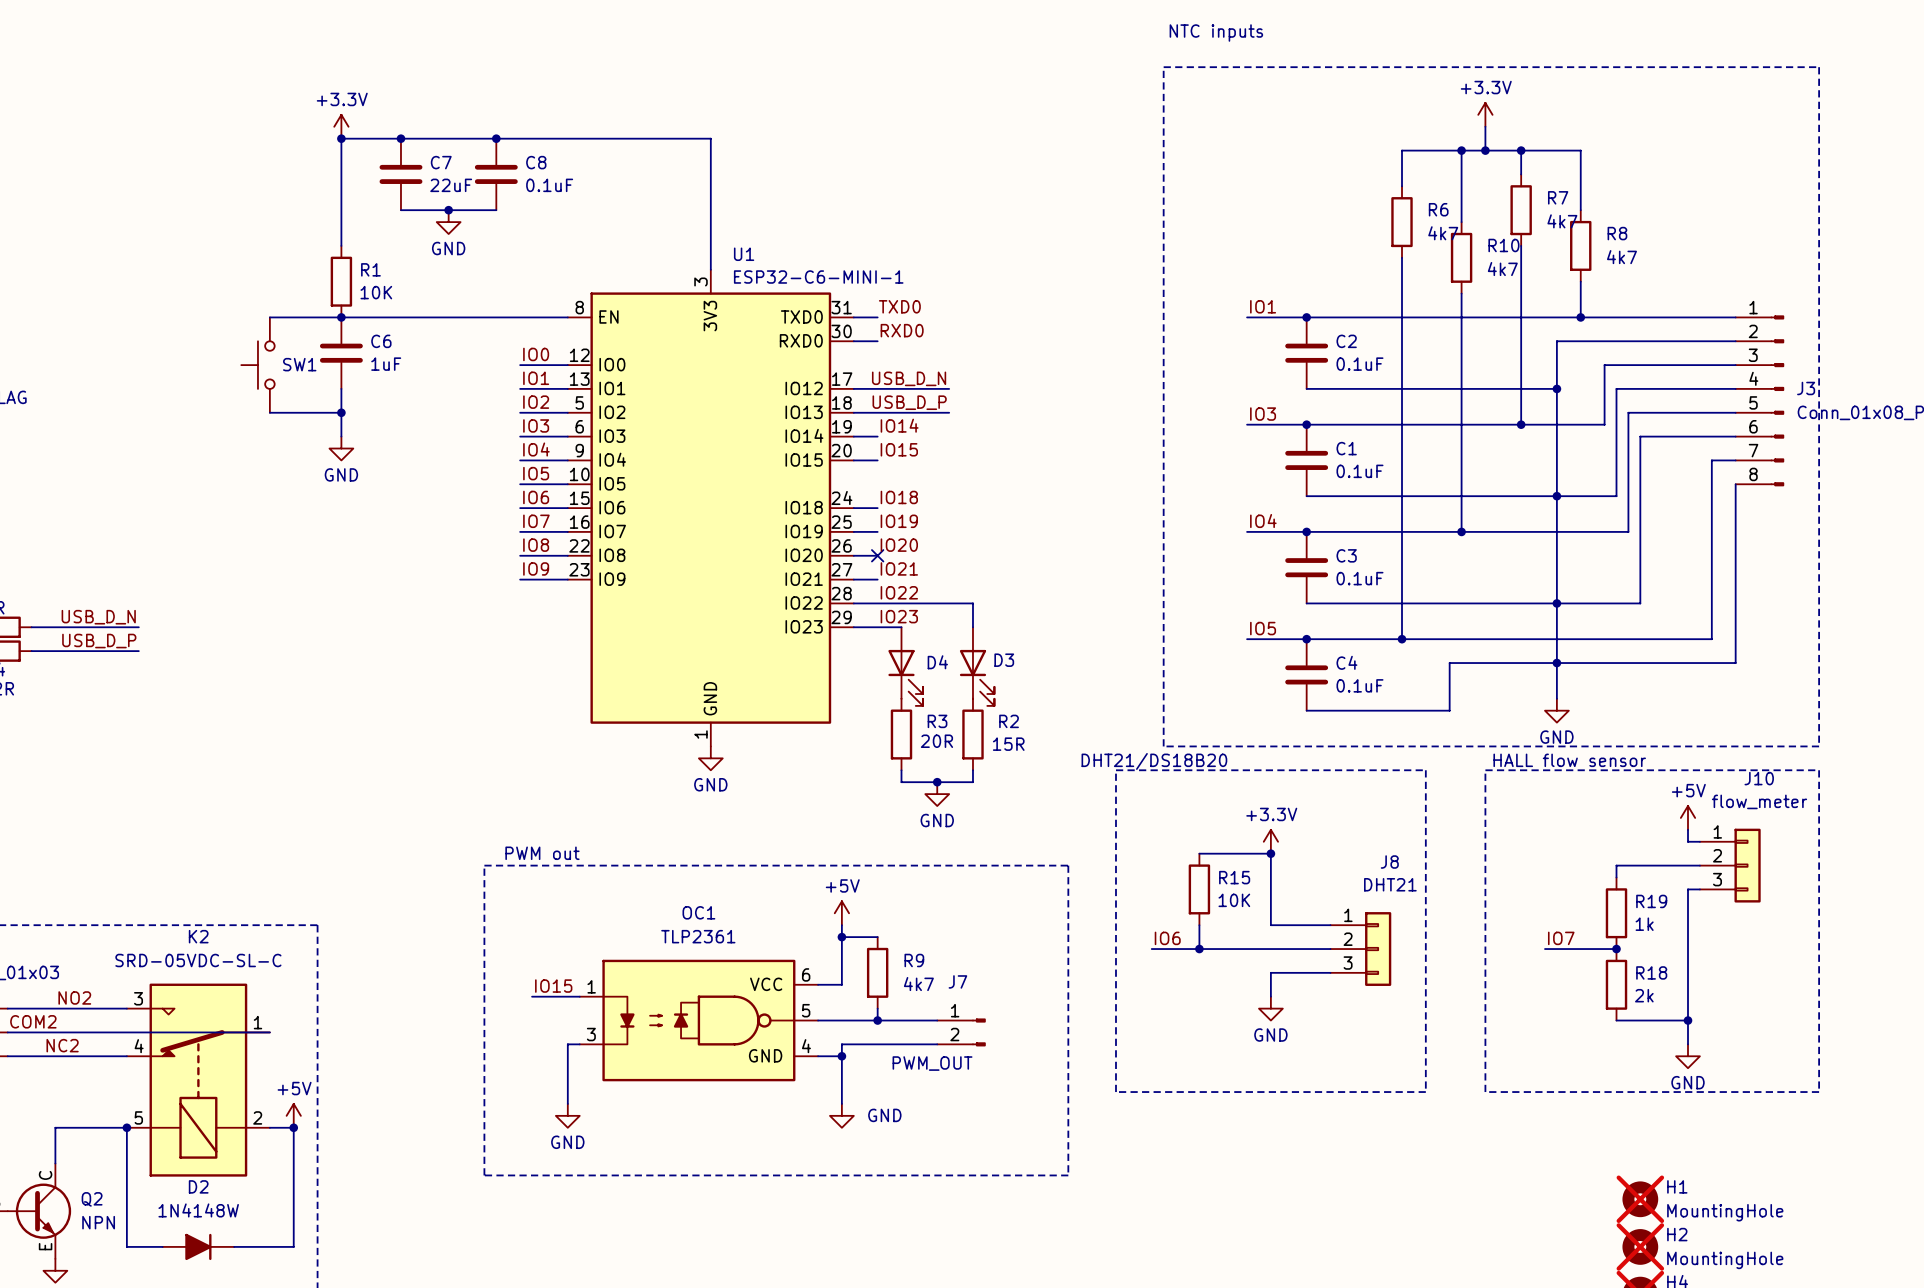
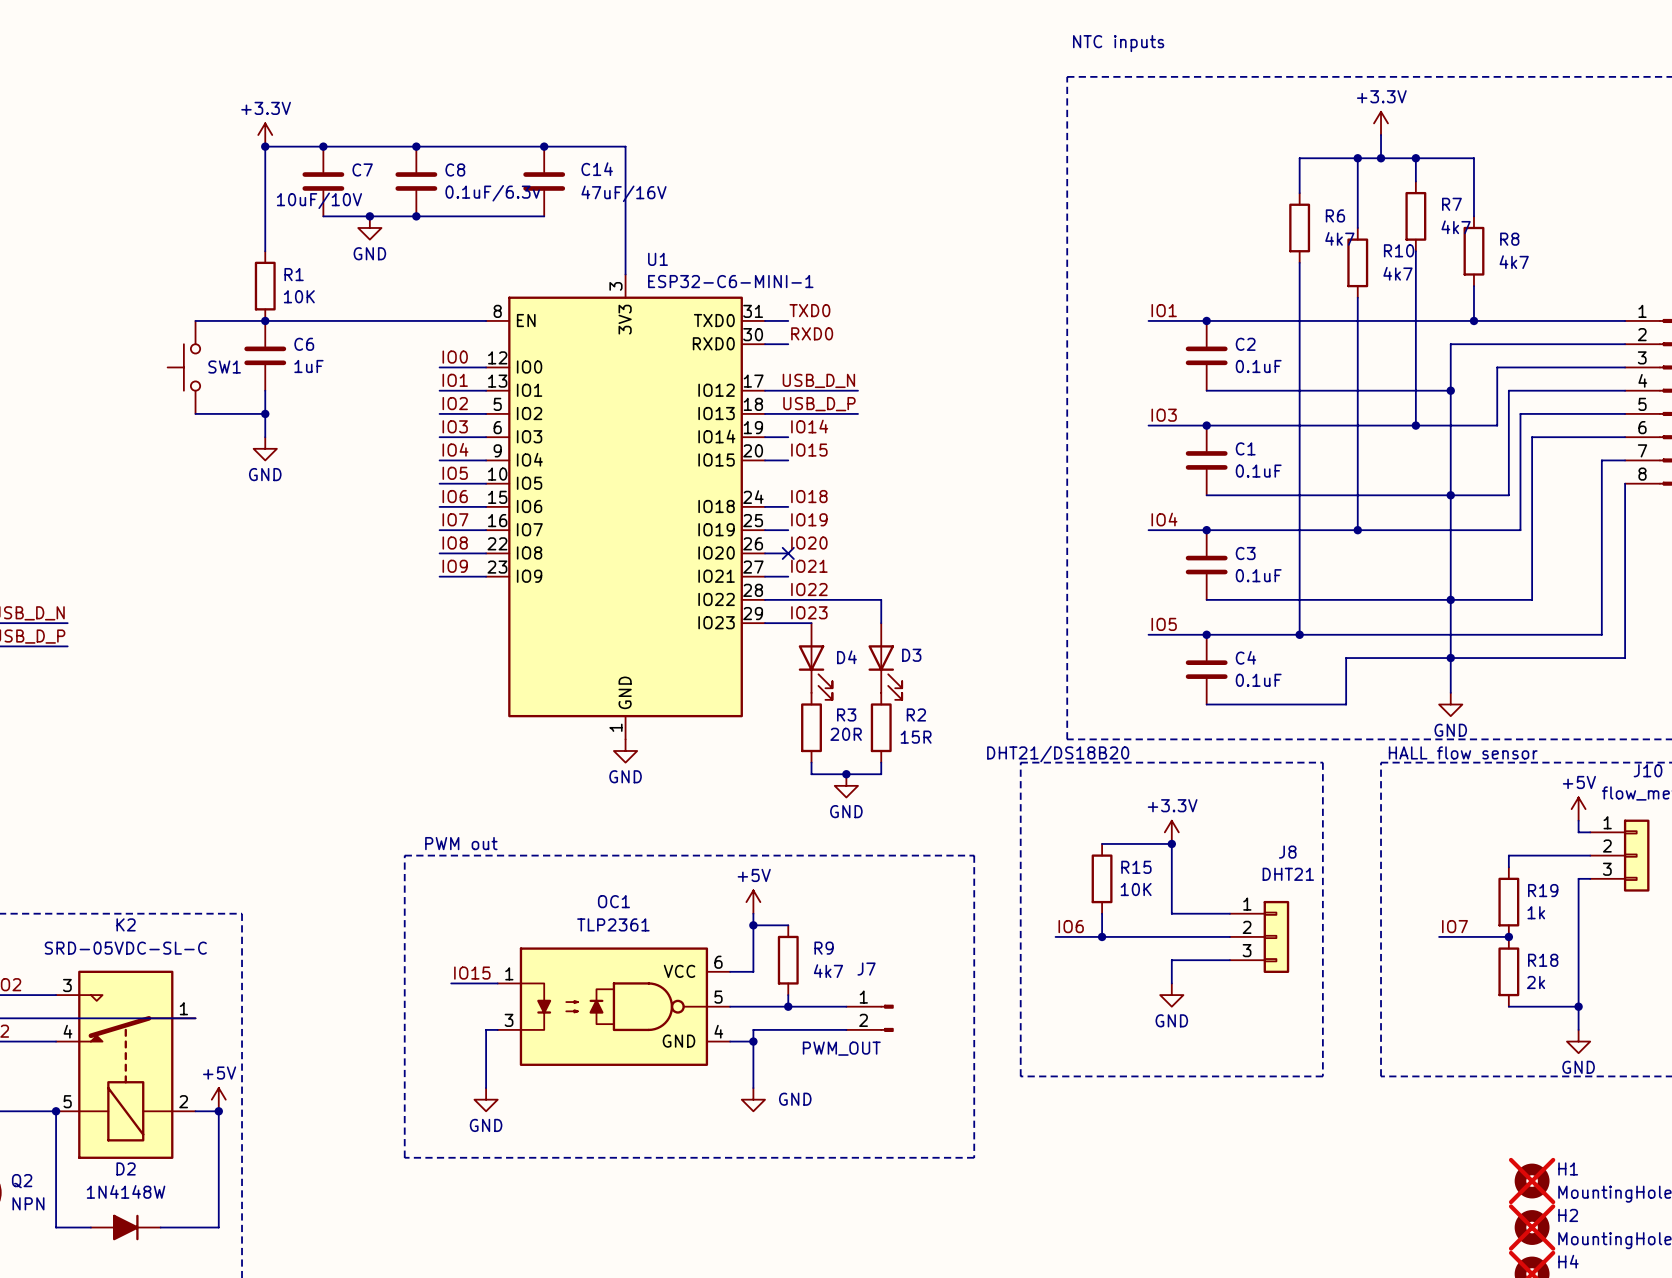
junction: none -> (544, 146)
C14: none -> 47uF/16V (544, 181)
C7 value: 22uF (451, 185) -> 10uF/10V (319, 200)
C8 value: 0.1uF (549, 185) -> 0.1uF/6.3v (492, 193)
wire: none -> (416, 216) (544, 216)
junction: none -> (416, 216)

